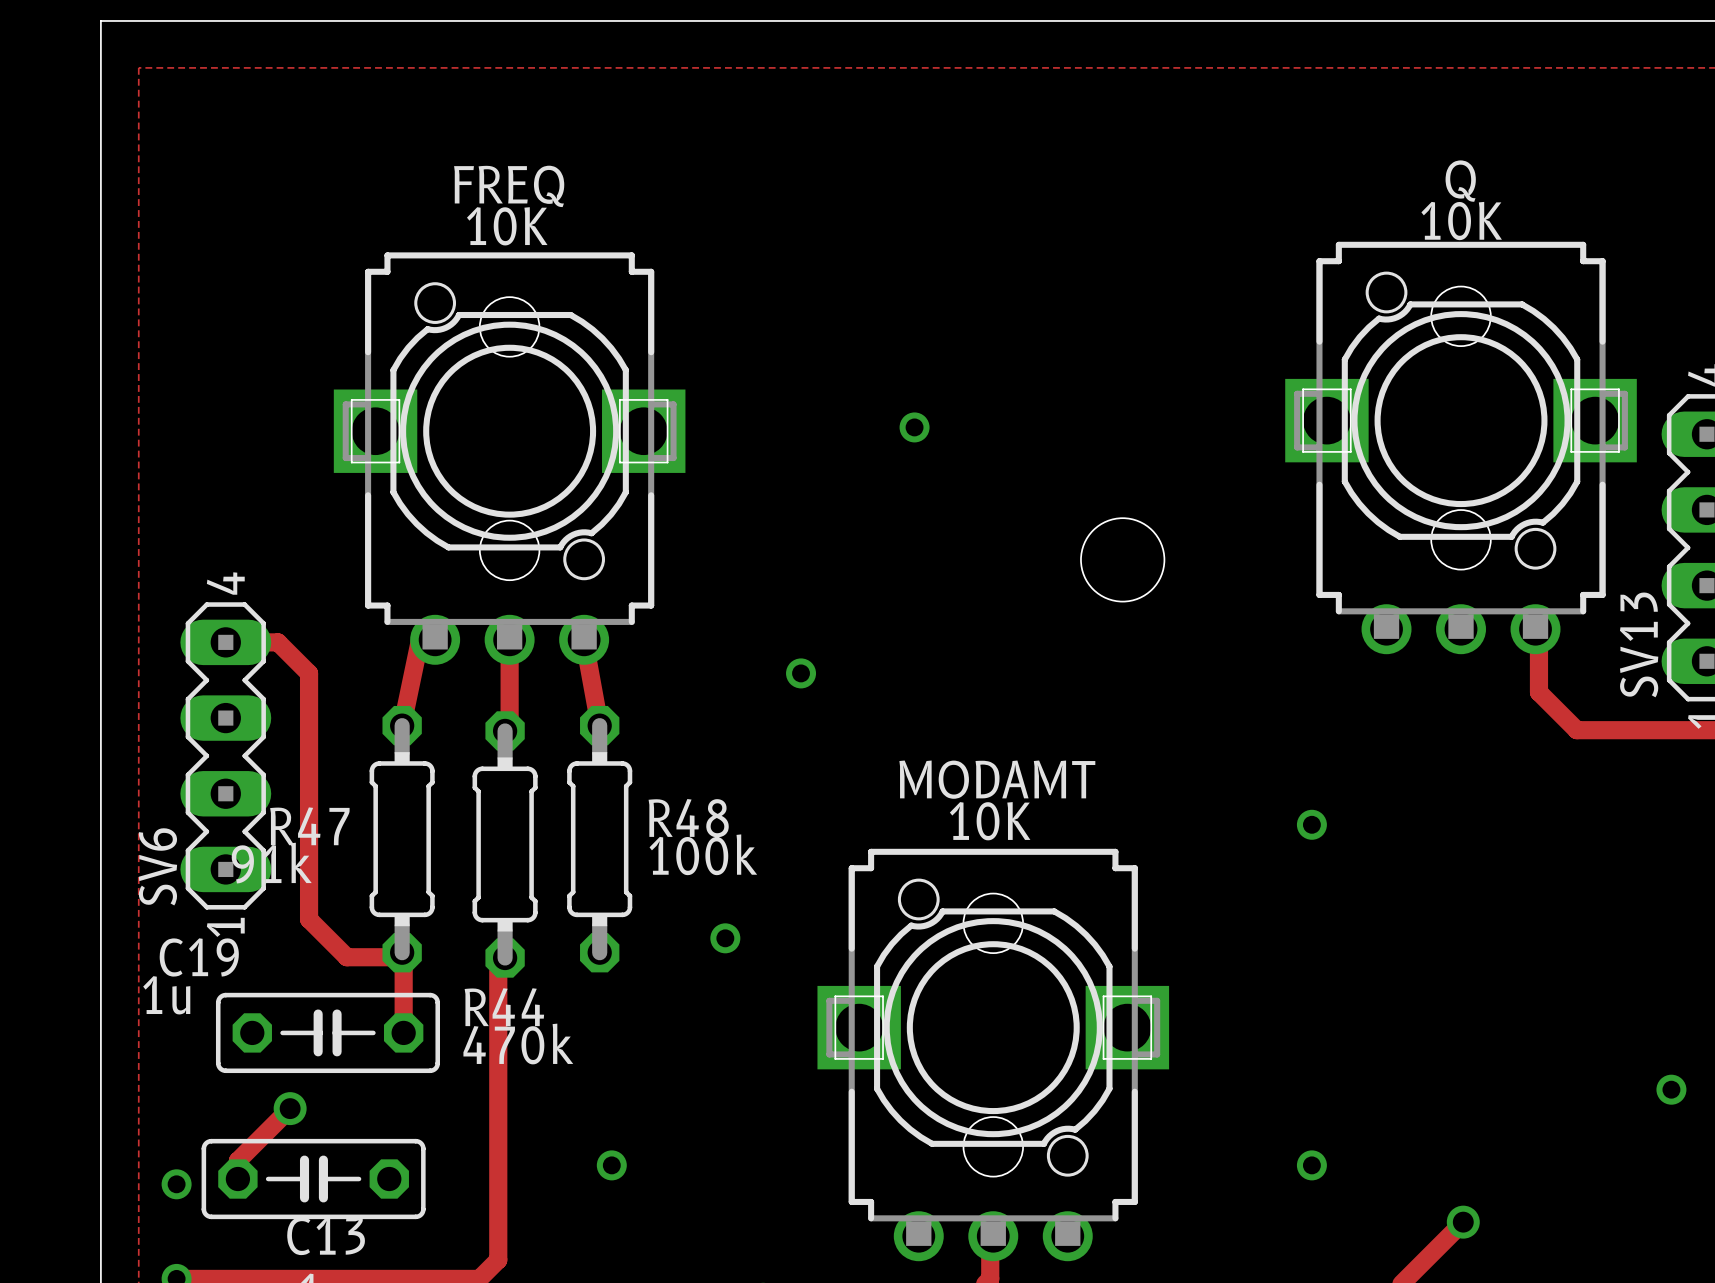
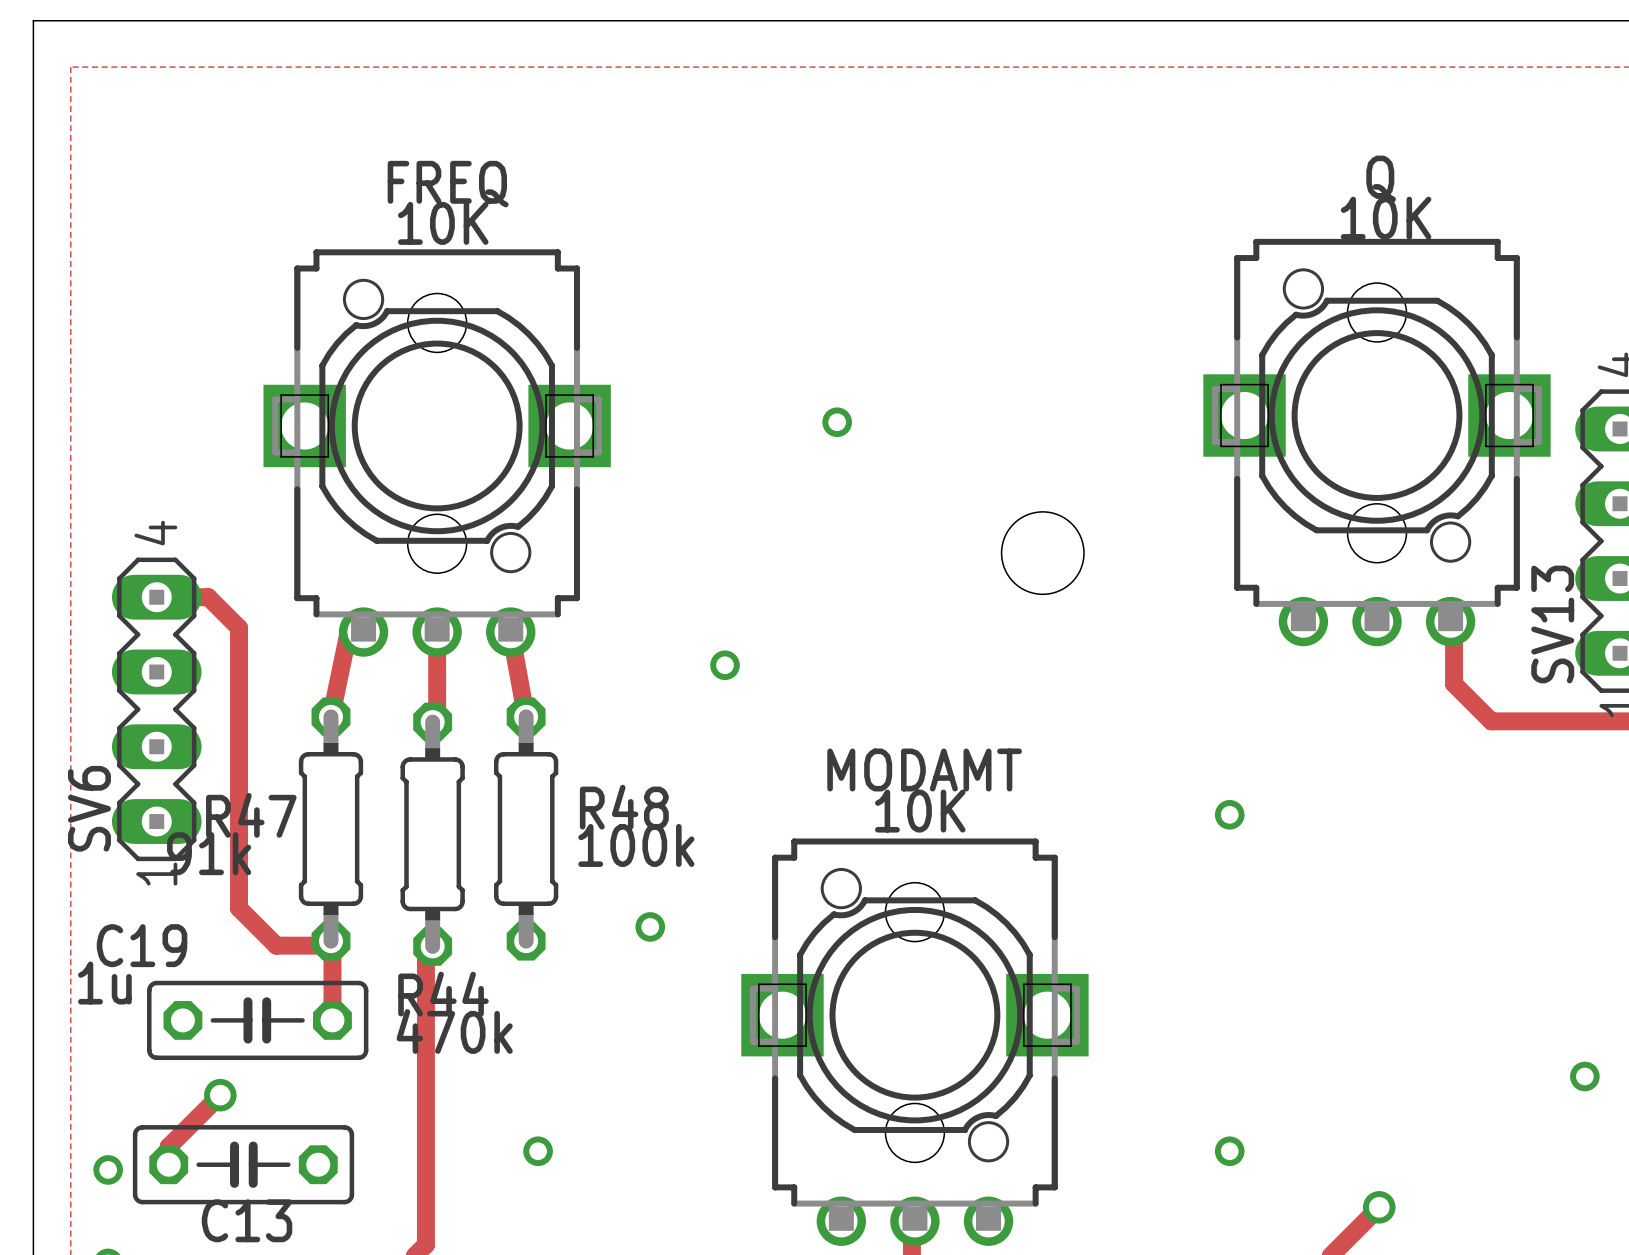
track: (225, 642) (278, 642) (309, 673) -> (156, 597) (208, 597) (239, 627) (239, 665)
SV6 position: (225, 755) -> (156, 709)

